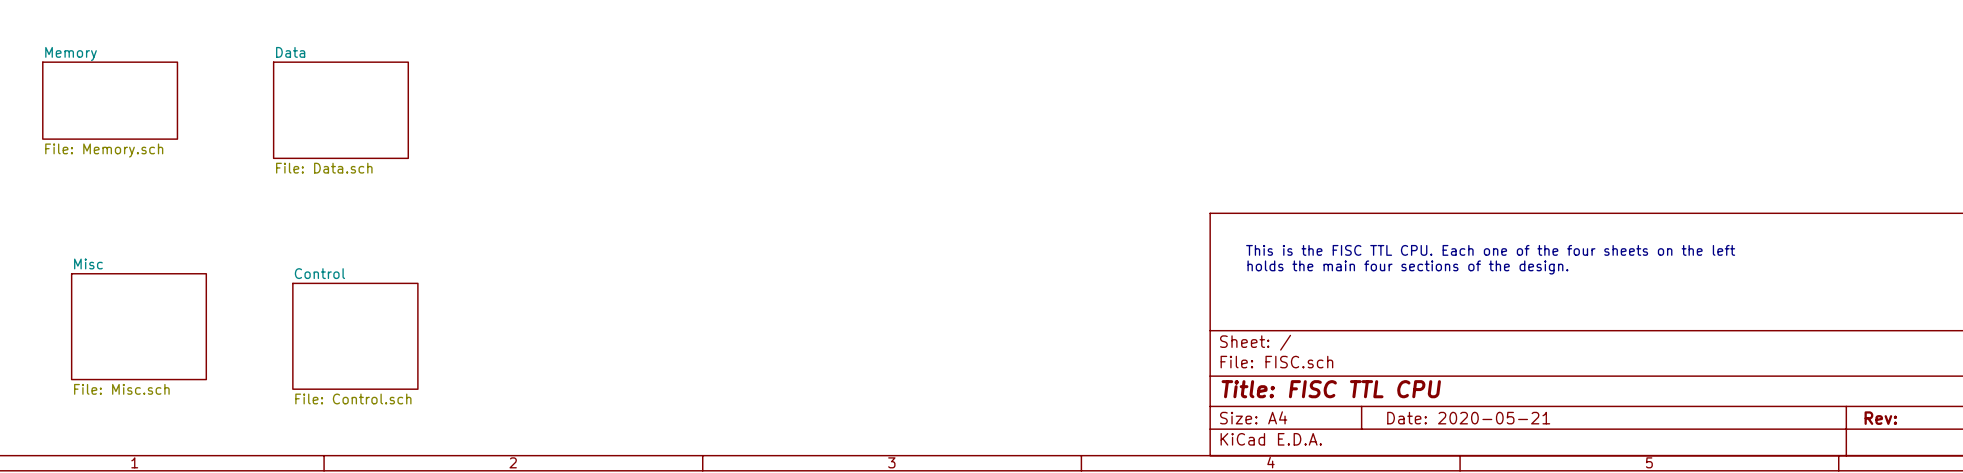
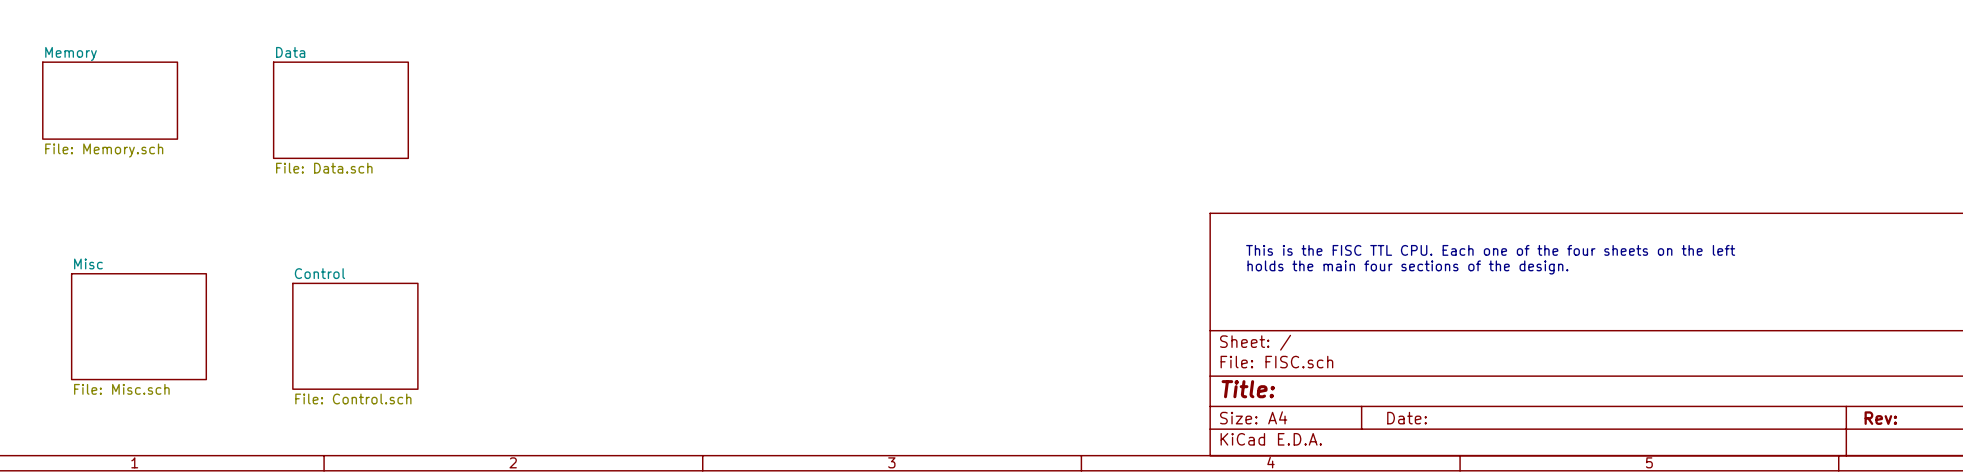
title block: Title: FISC TTL CPU (1331, 389) -> Title: (1248, 389)
title block: Date: 2020-05-21 (1468, 418) -> Date: (1407, 418)

